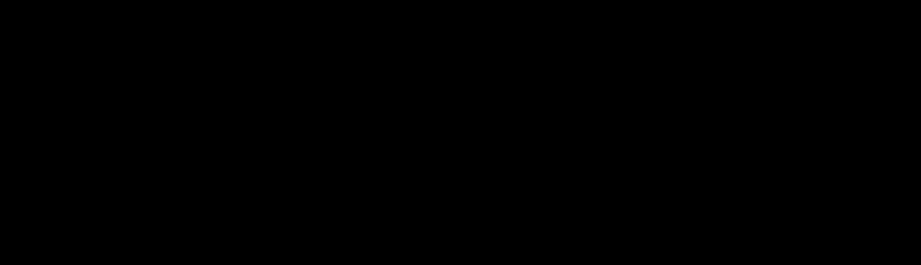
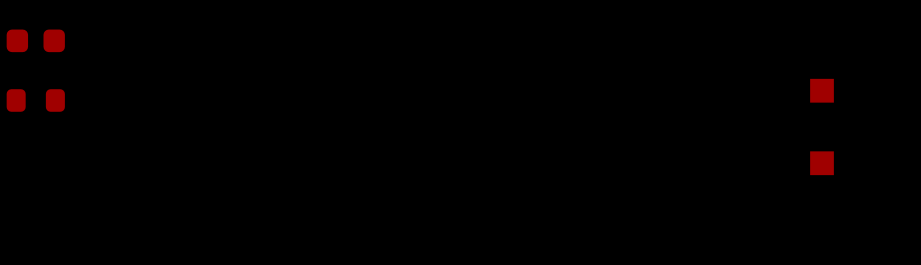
part: none -> (35, 40)
part: none -> (822, 90)
part: none -> (35, 100)
part: none -> (822, 163)

